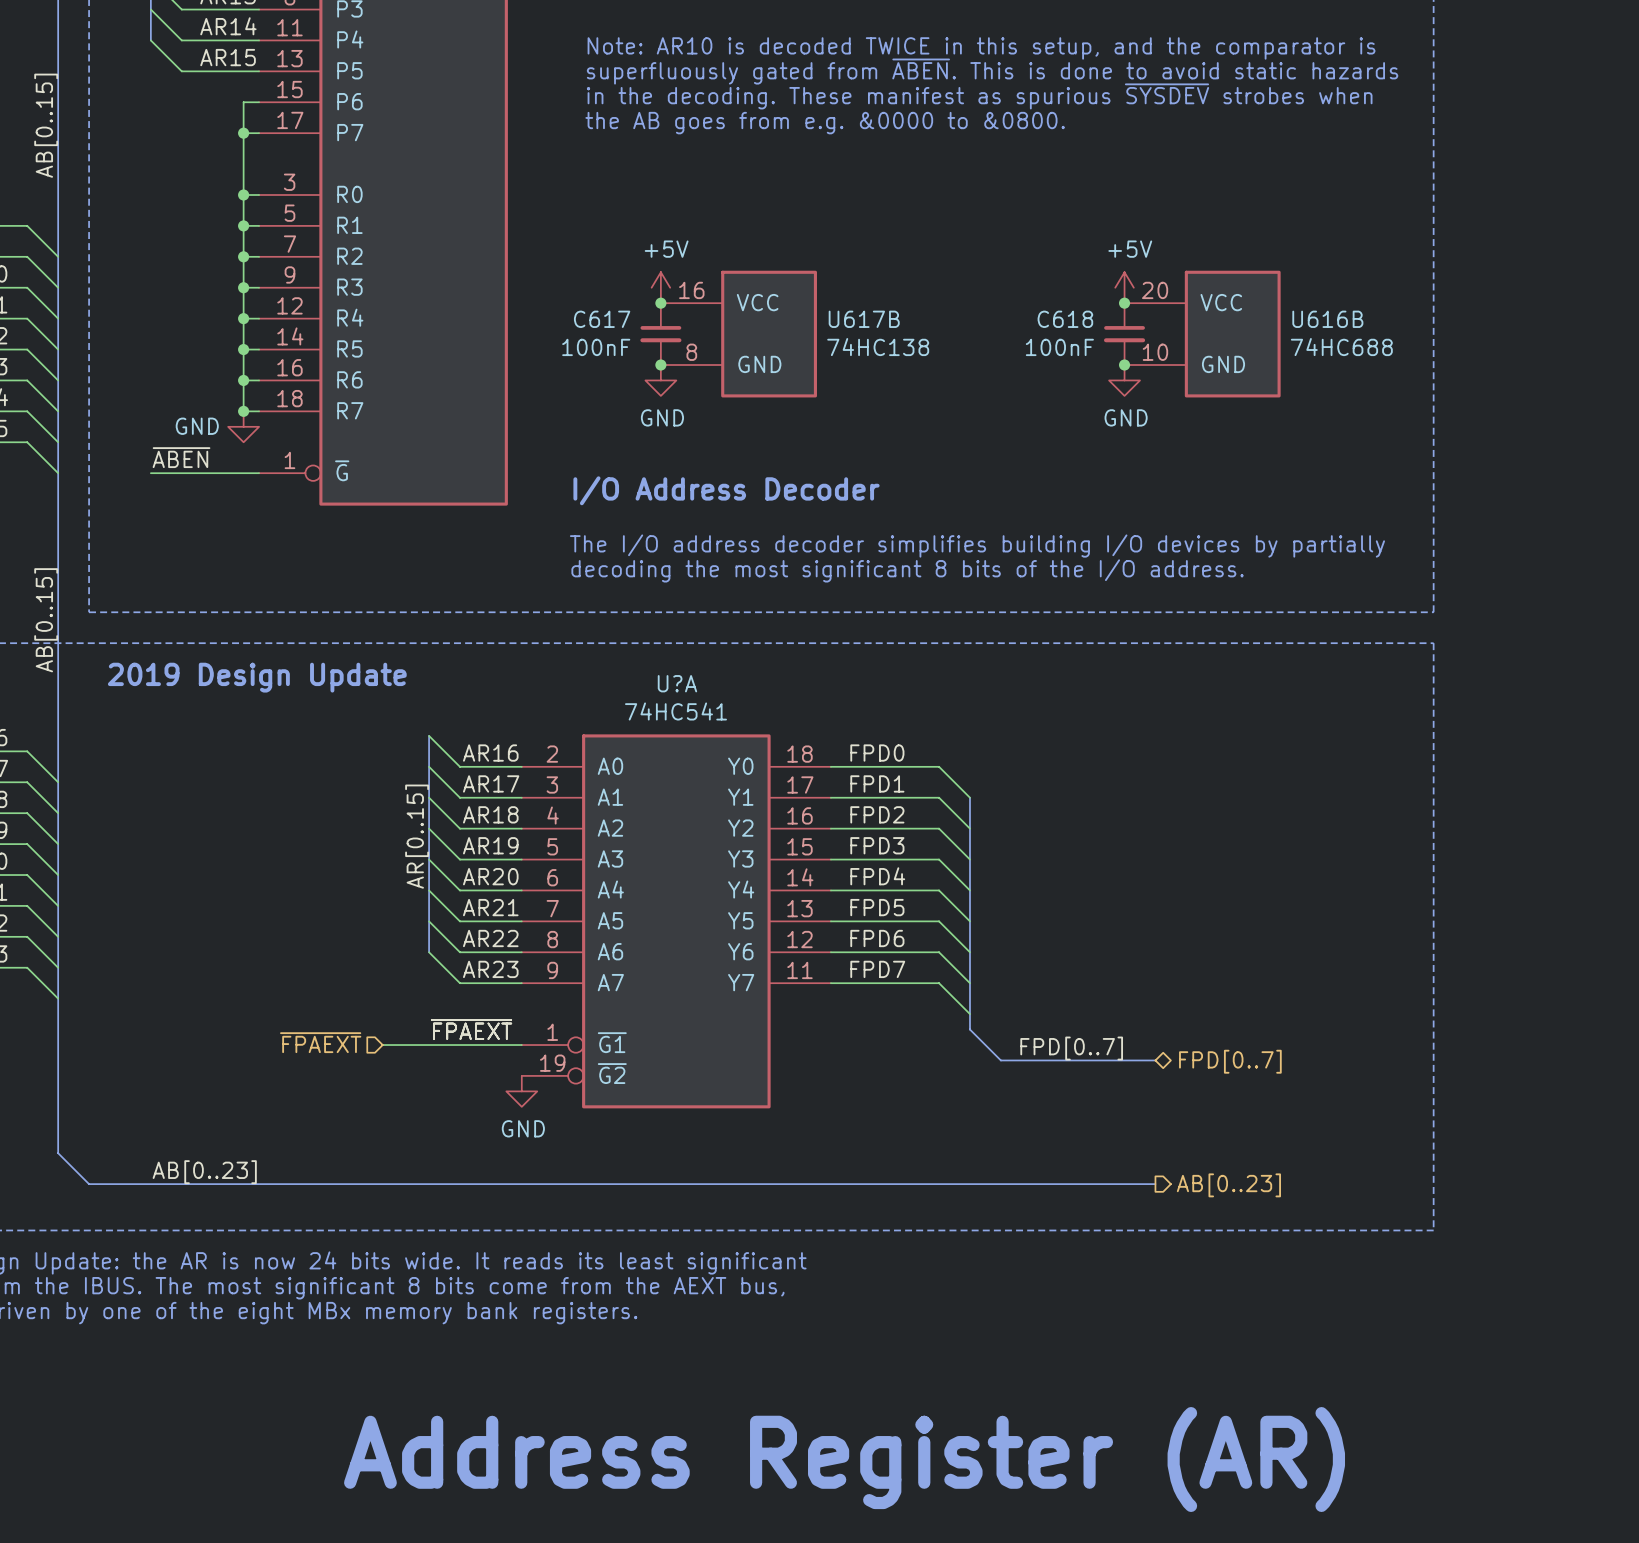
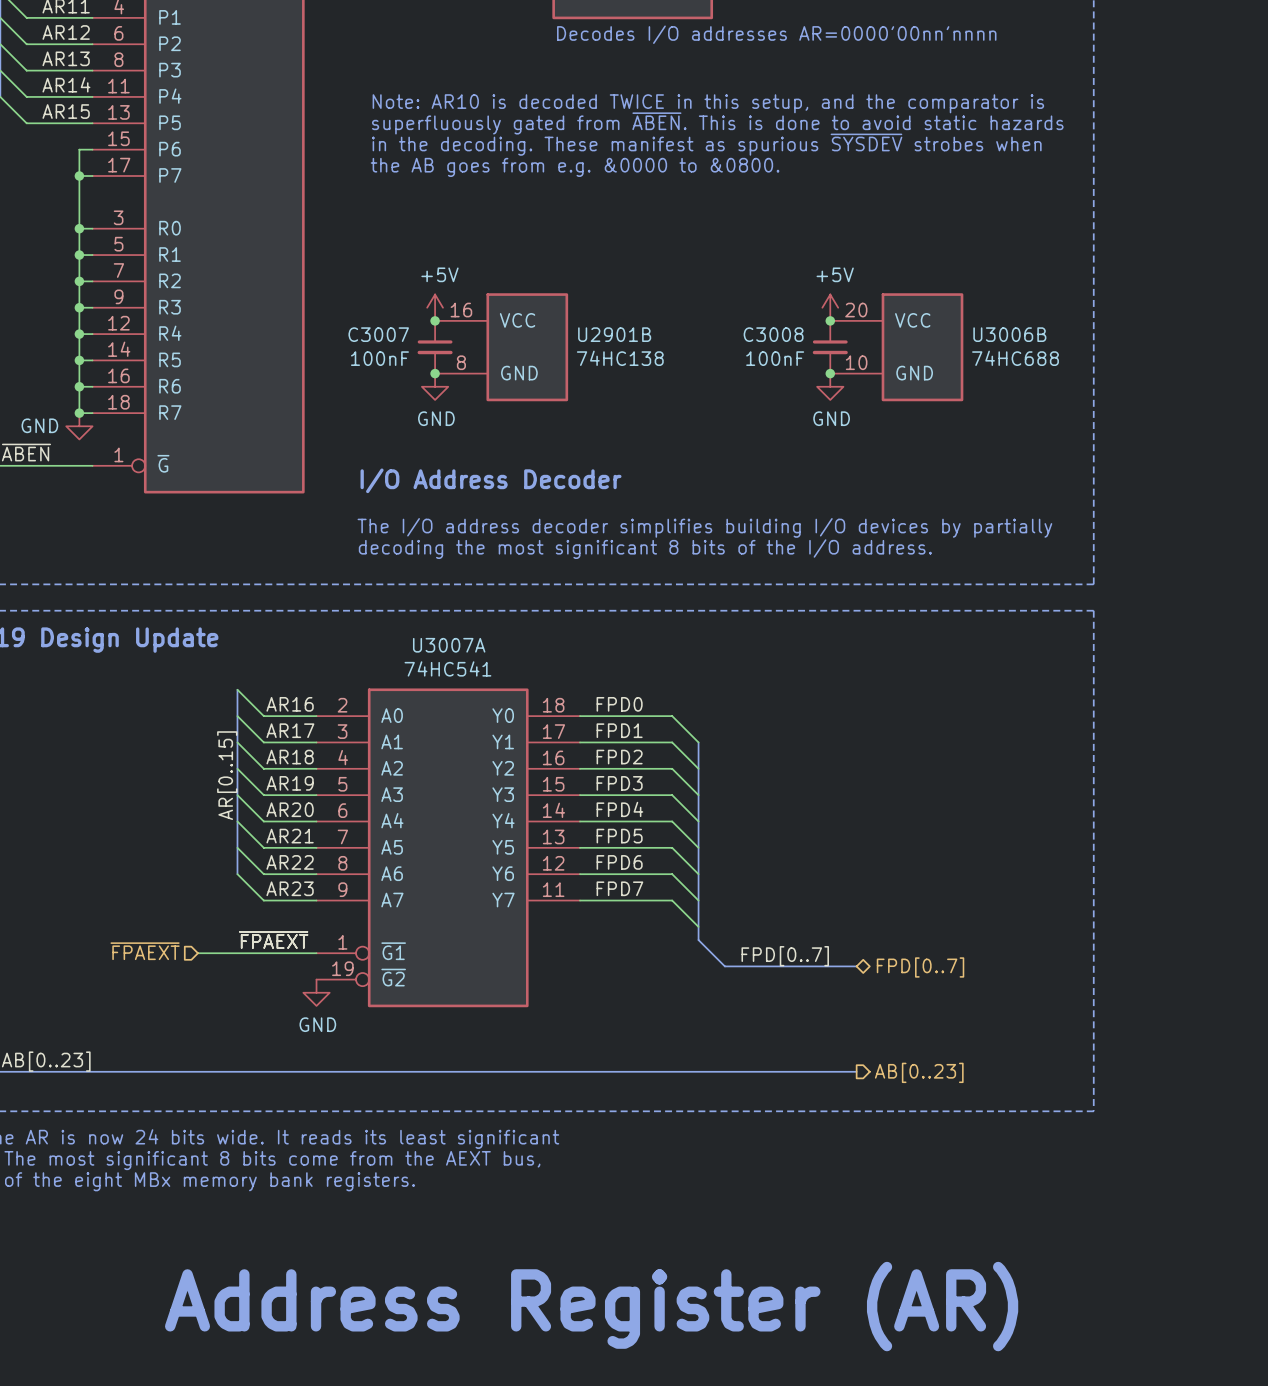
C617 name: C617 (602, 319) -> C3007 (378, 334)
U617B name: U617B (864, 319) -> U2901B (614, 334)
C618 name: C618 (1065, 319) -> C3008 (773, 334)
U616B name: U616B (1327, 319) -> U3006B (1009, 334)
U?A name: U?A (677, 683) -> U3007A (449, 645)

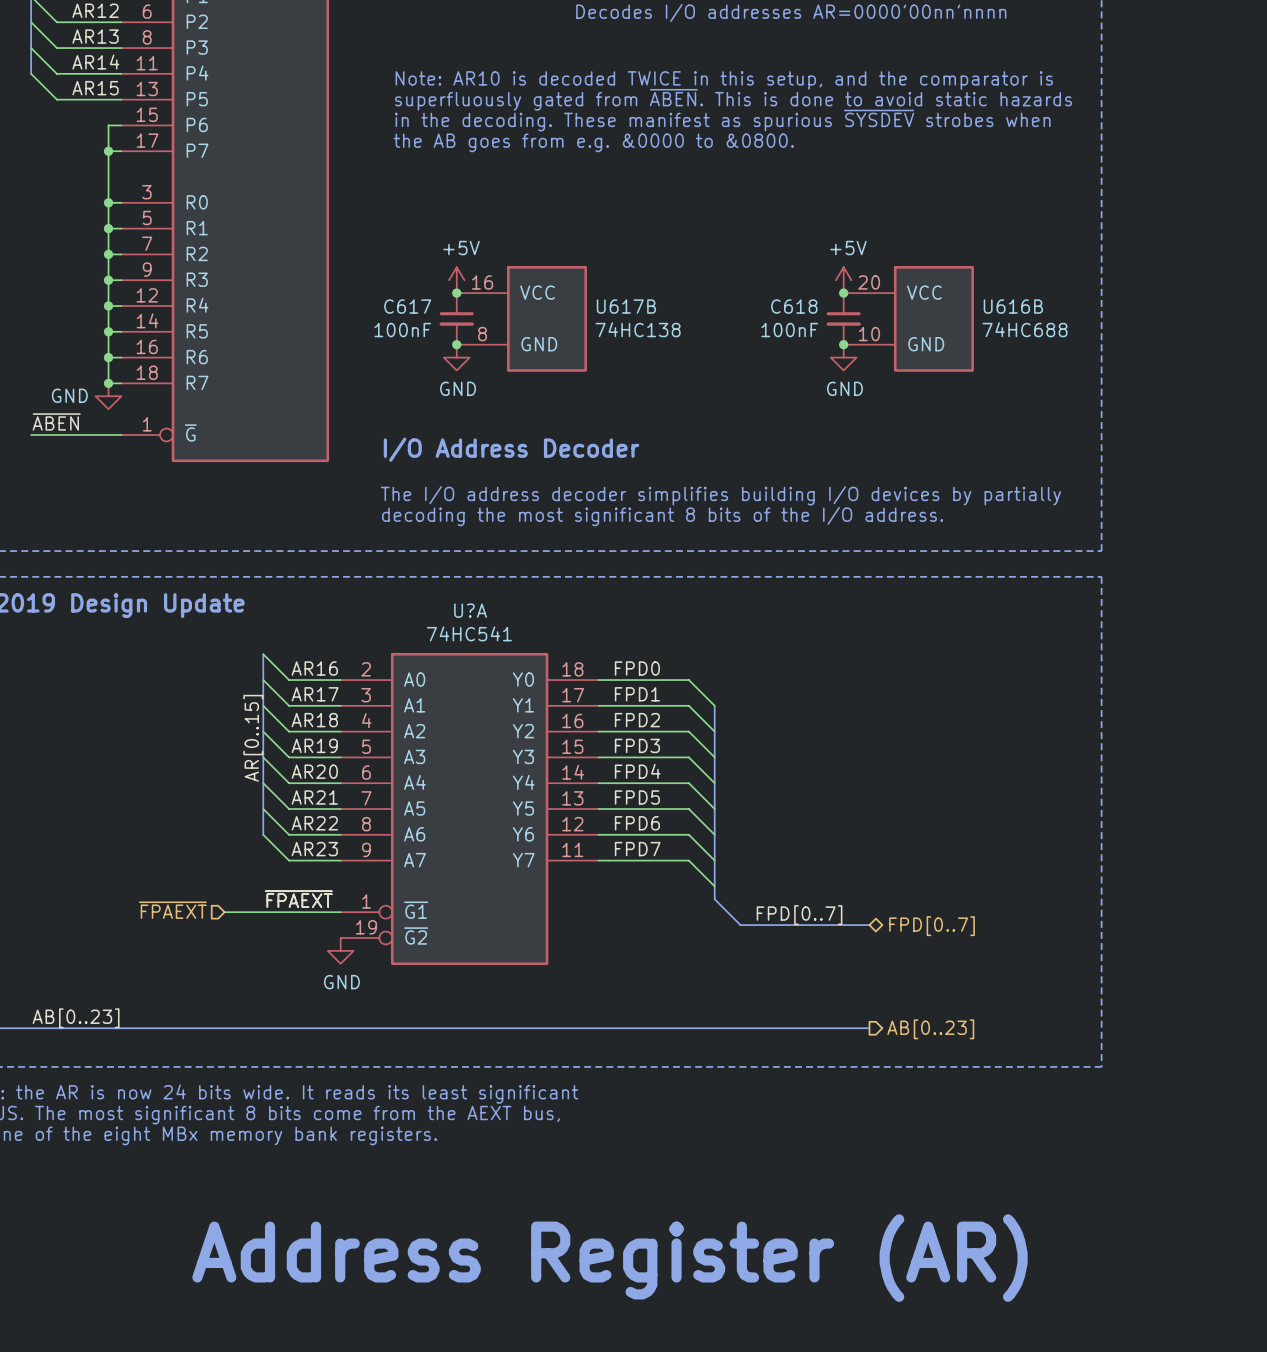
C3007 name: C3007 (378, 334) -> C617 (407, 306)
U2901B name: U2901B (614, 334) -> U617B (626, 306)
C3008 name: C3008 (773, 334) -> C618 (794, 306)
U3006B name: U3006B (1009, 334) -> U616B (1013, 306)
U3007A name: U3007A (449, 645) -> U?A (470, 610)

